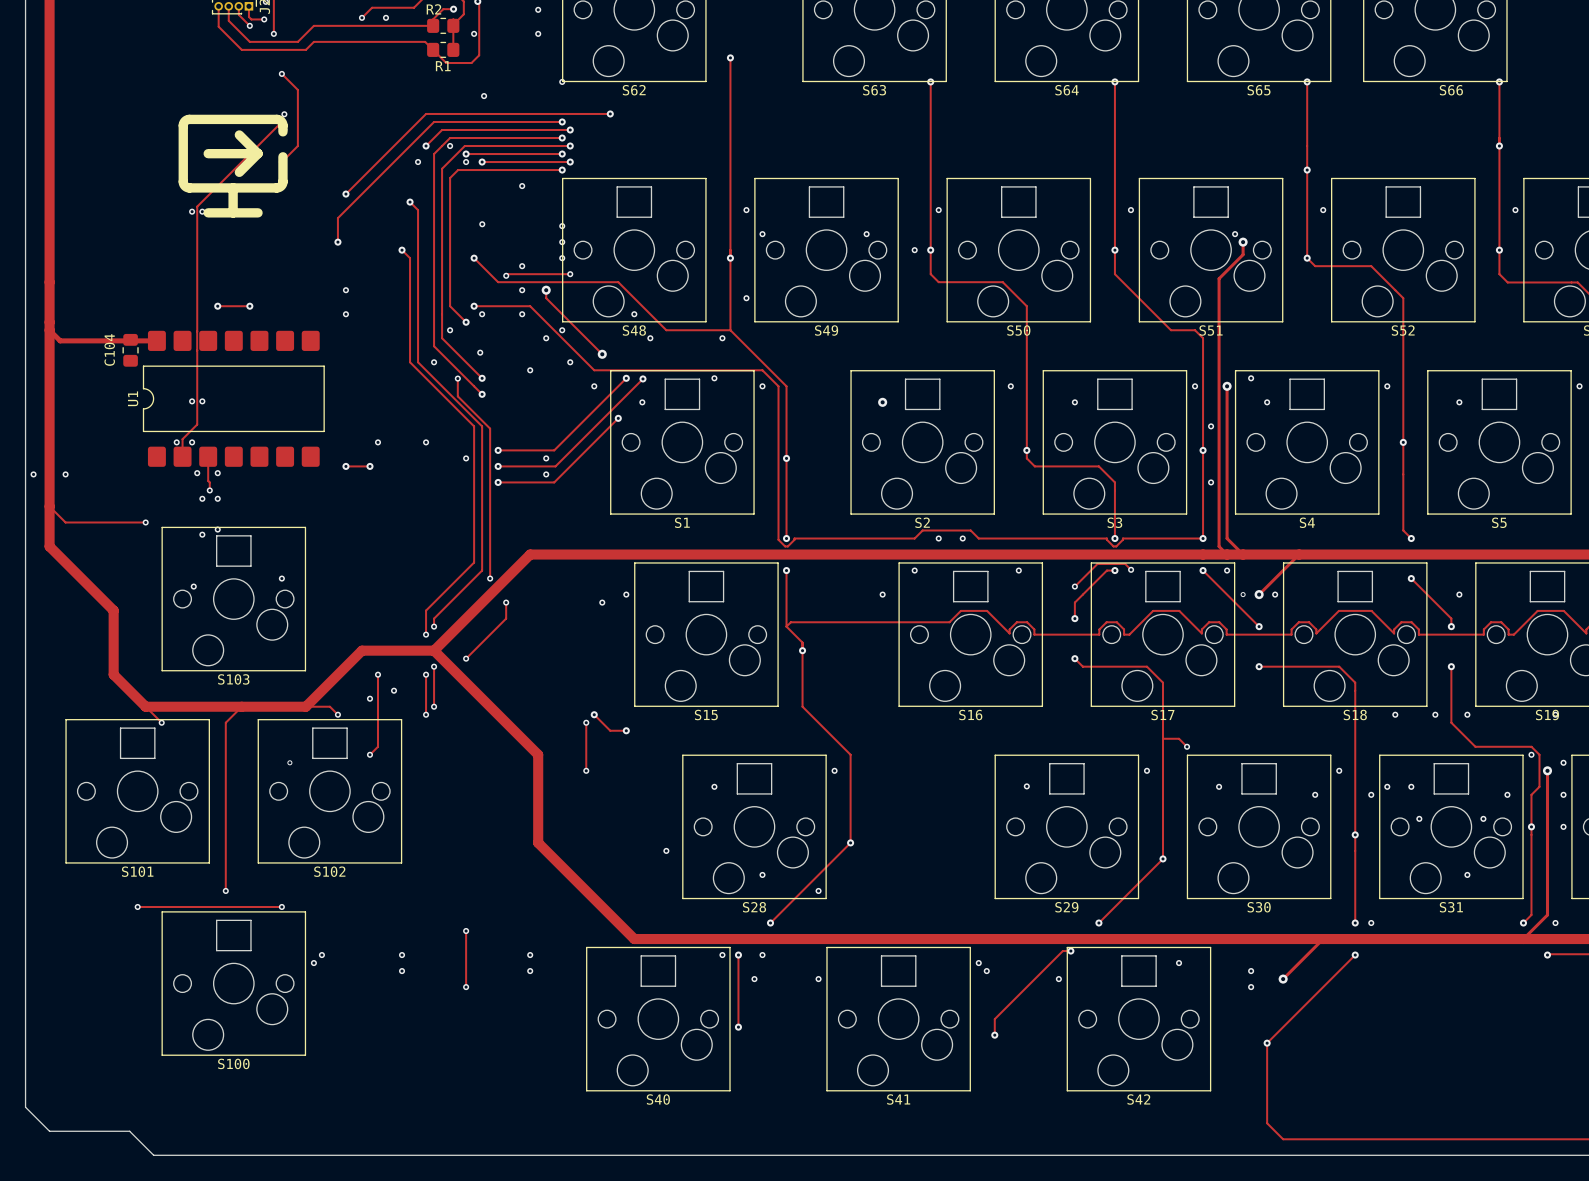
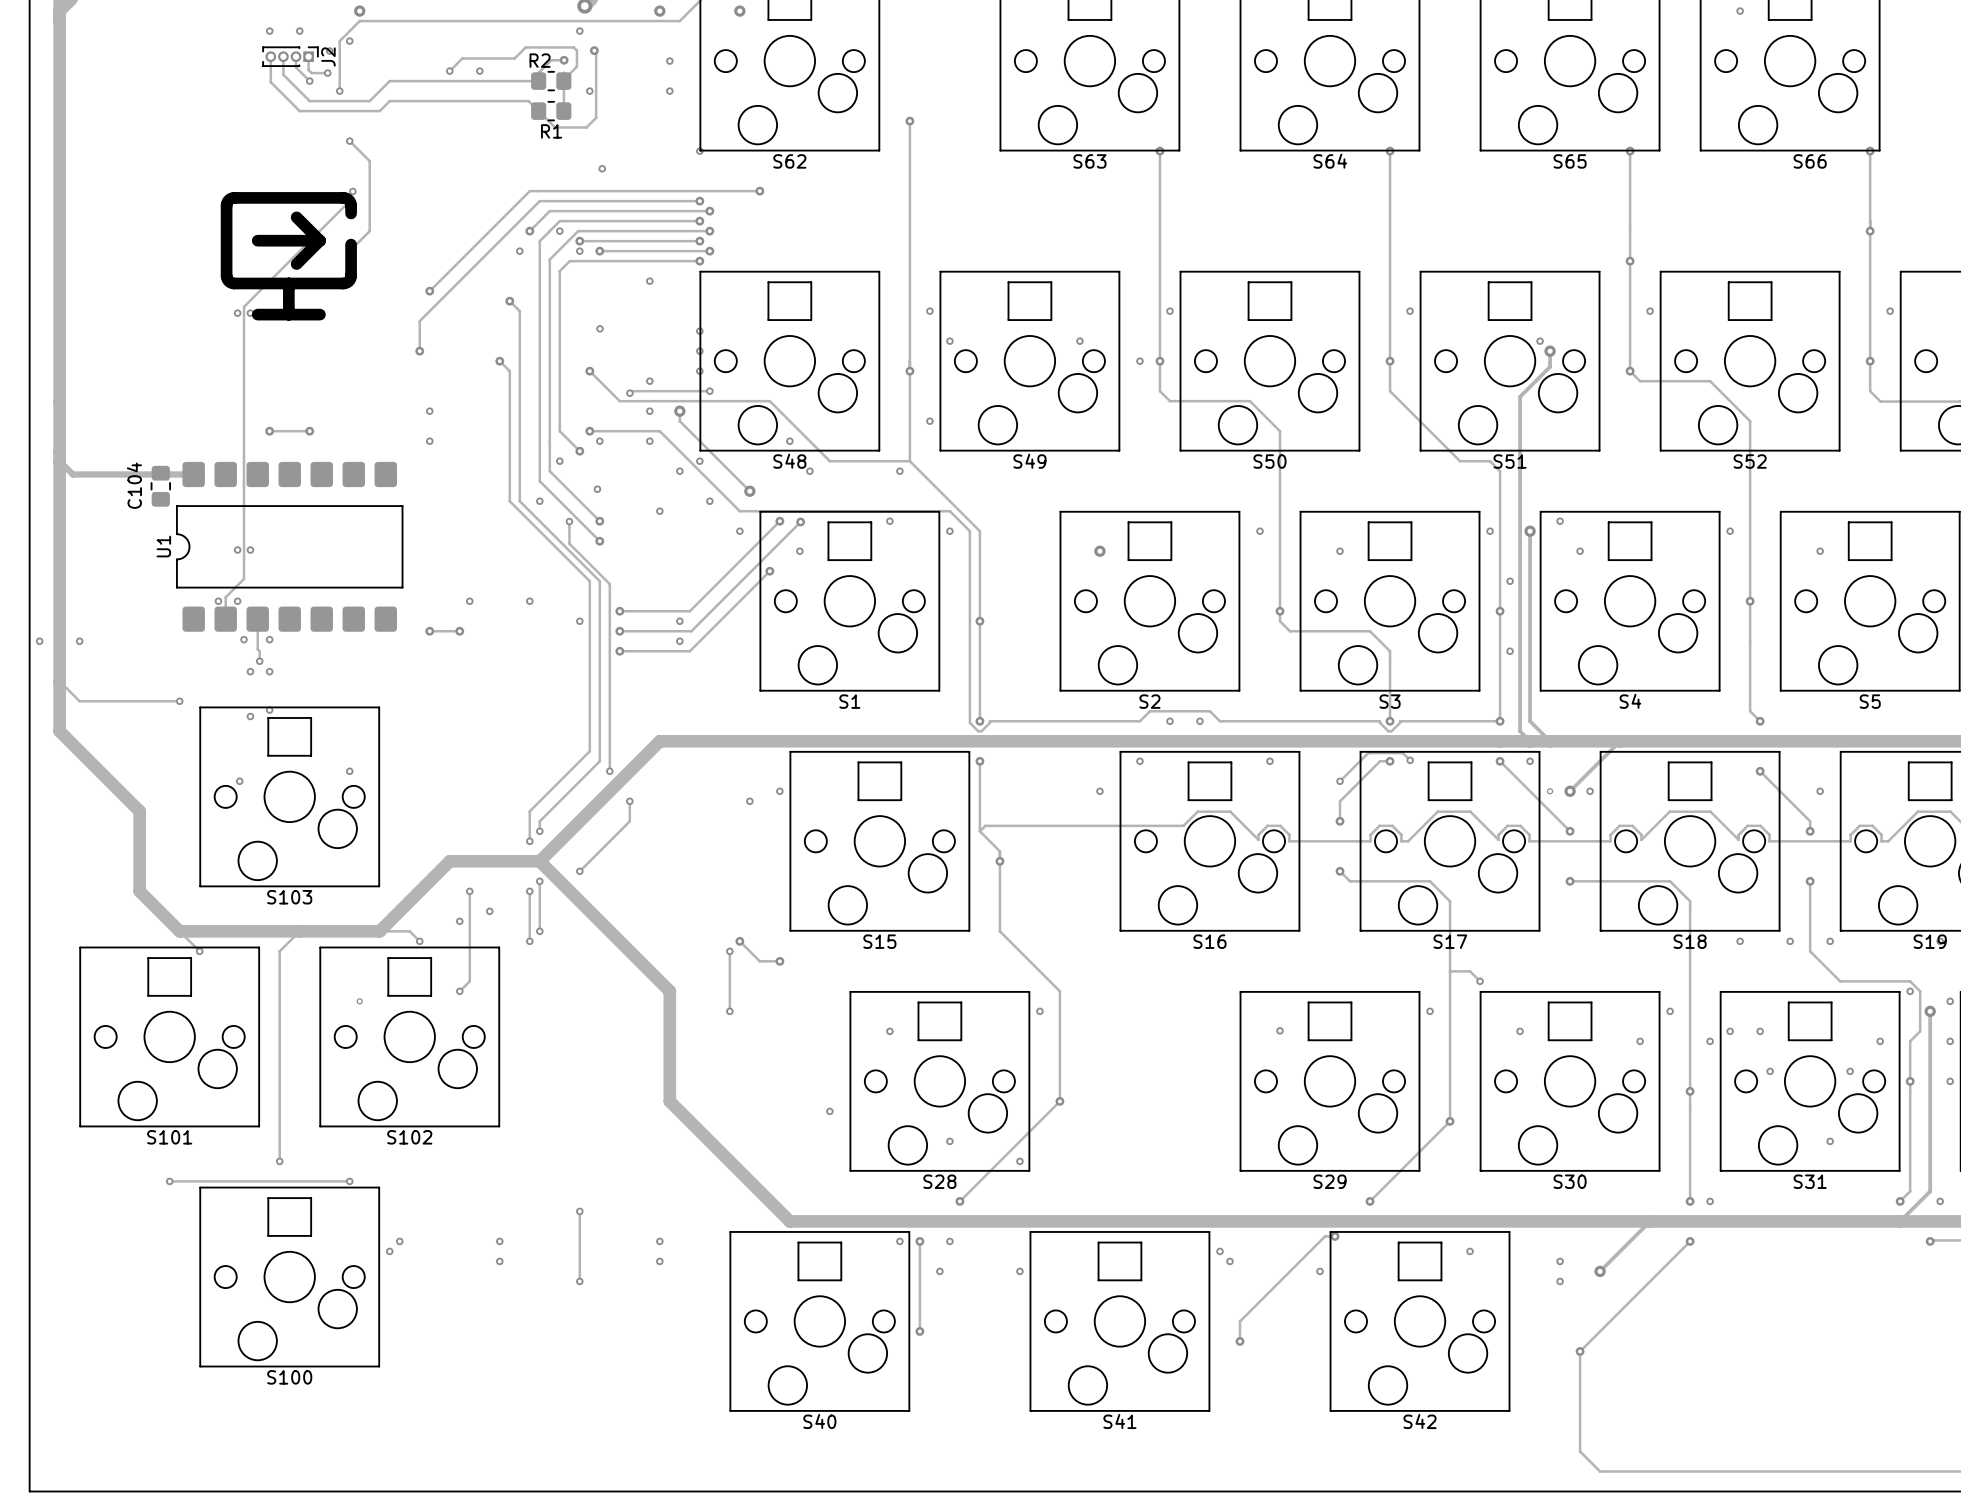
board edge: (25, 1107) (49, 1131) (129, 1131) (153, 1155) -> (29, 1431) (29, 1491) (189, 1491)

